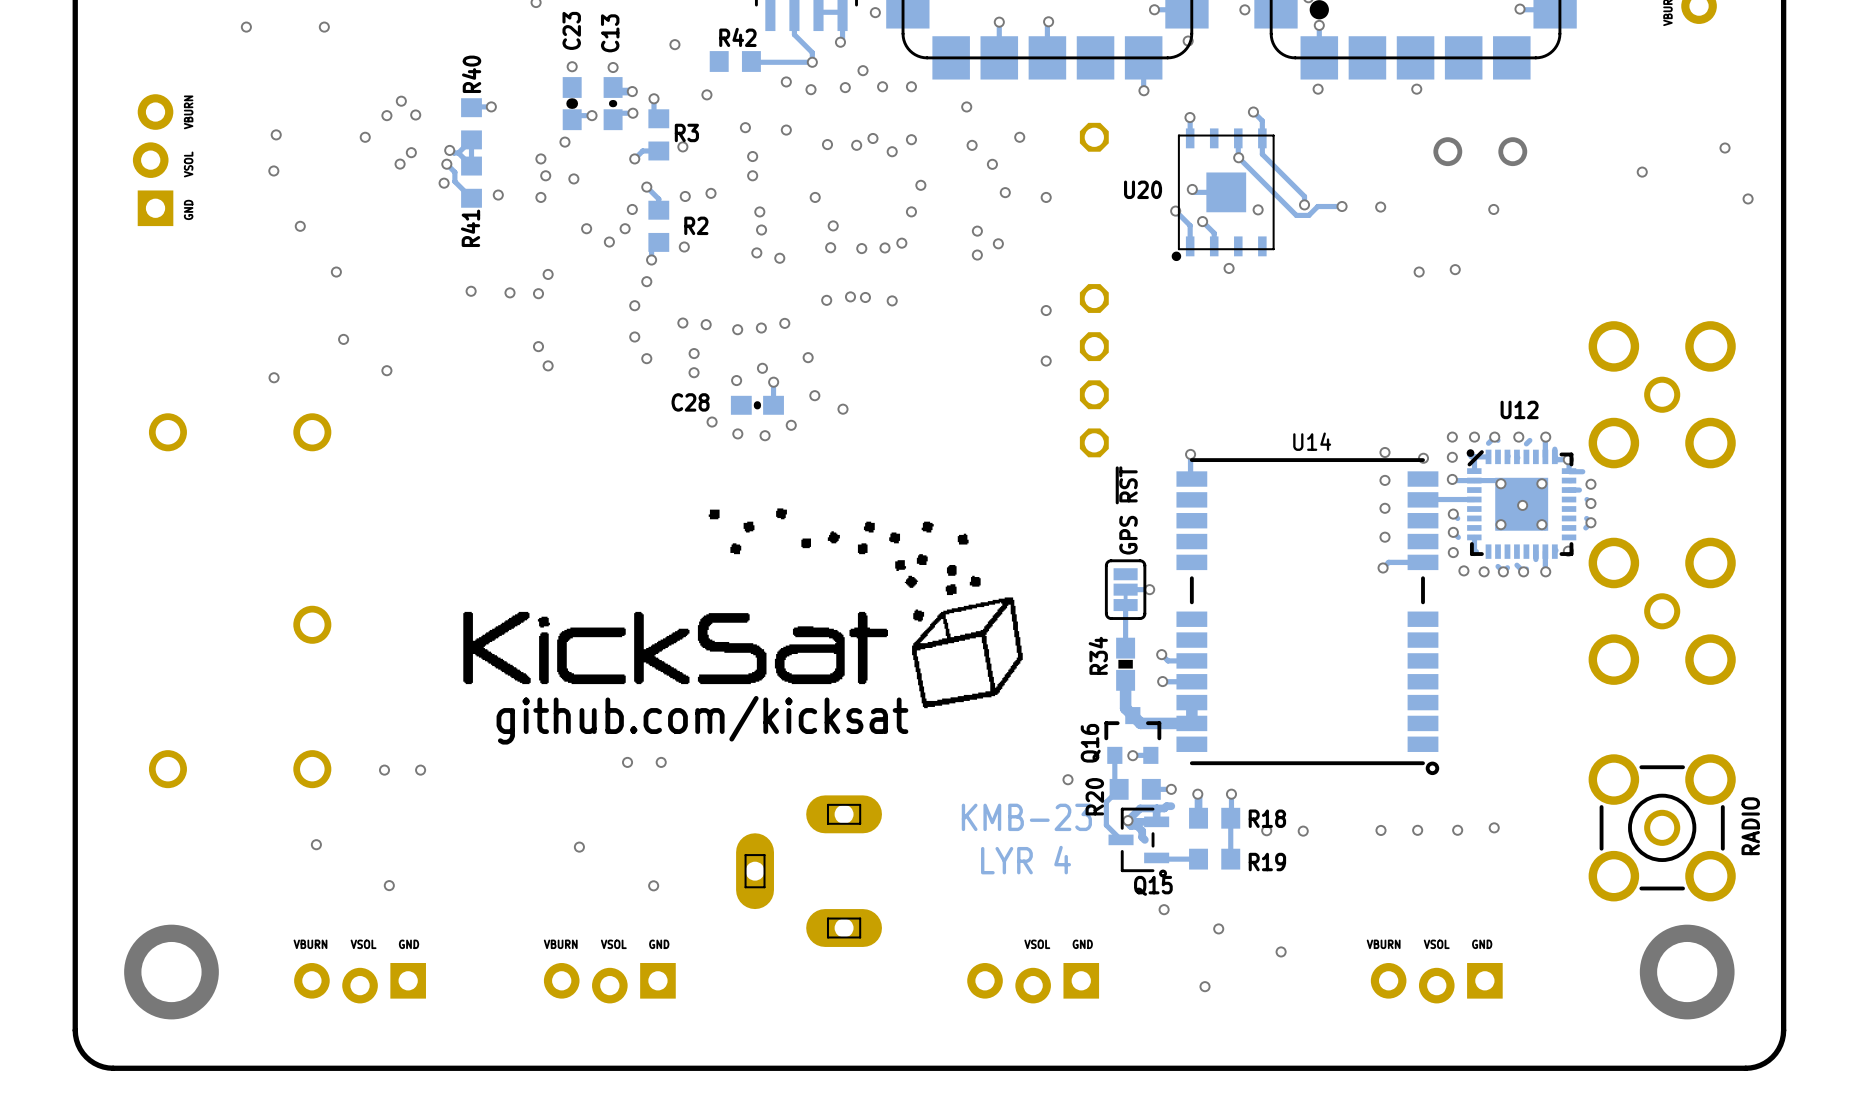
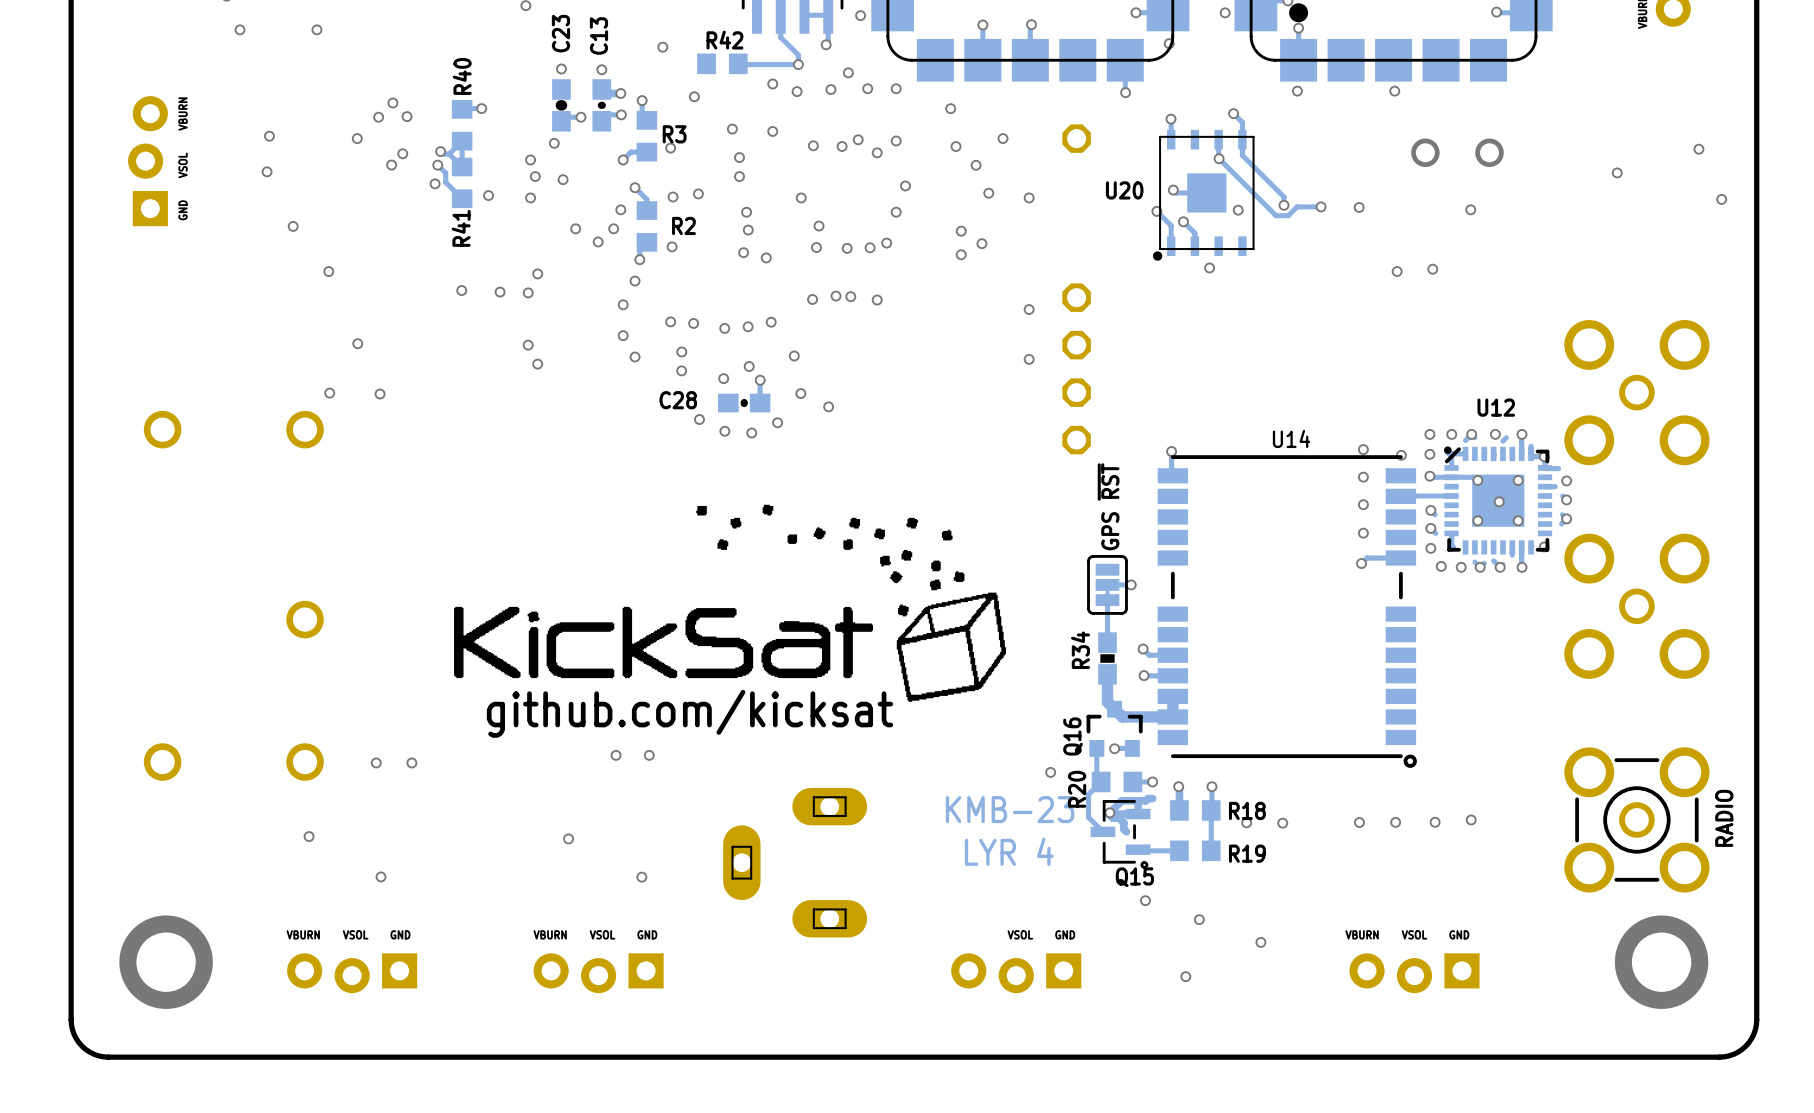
via: (343, 339) -> none
via: none -> (357, 343)
via: (386, 370) -> none
via: (274, 377) -> none
via: none -> (329, 393)
via: none -> (380, 394)

